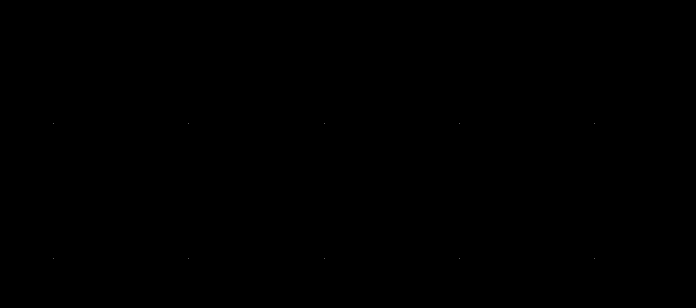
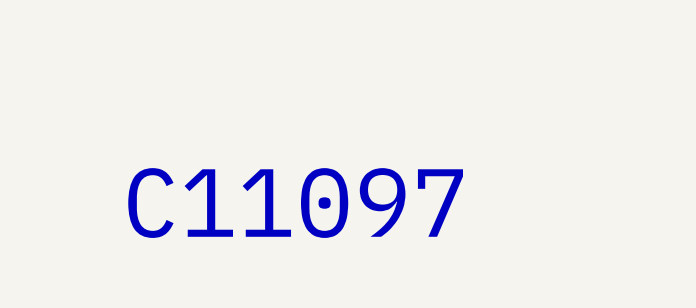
text: none -> C11097 (295, 203)

